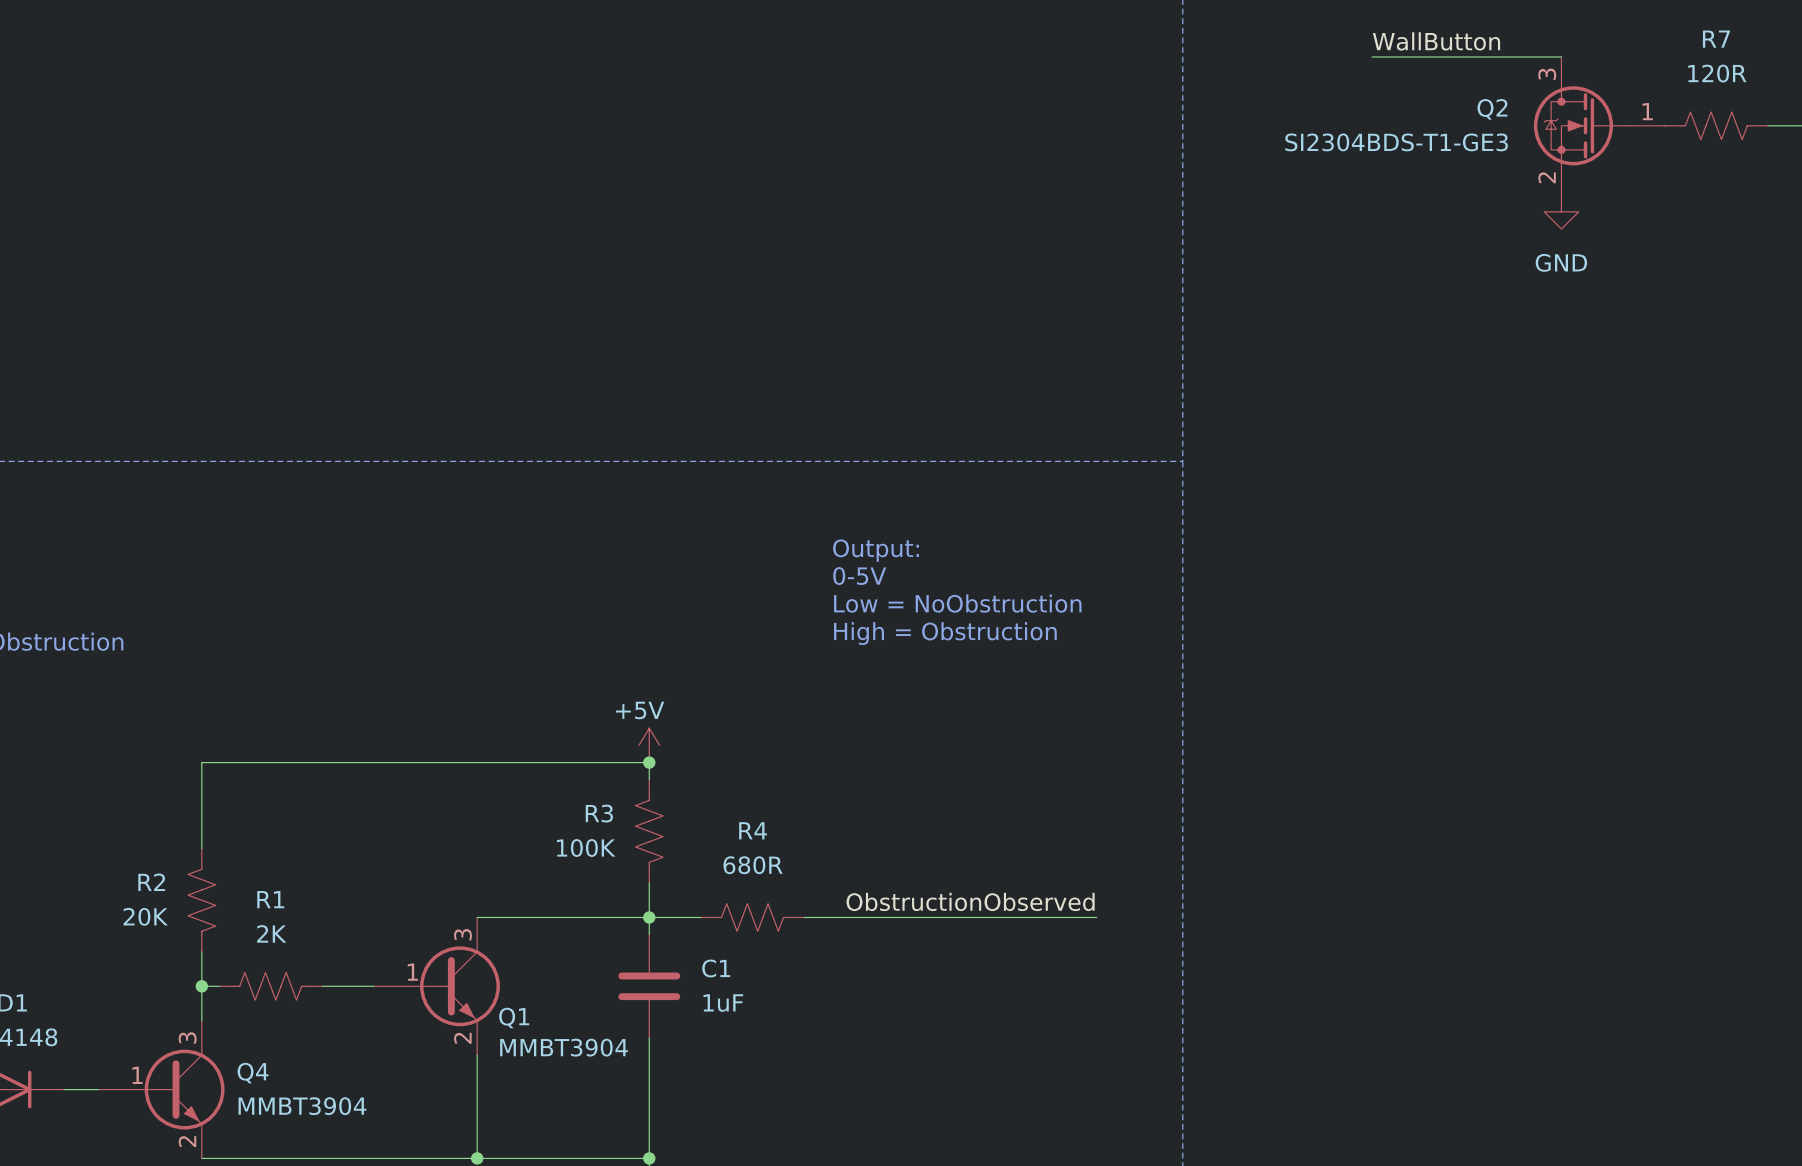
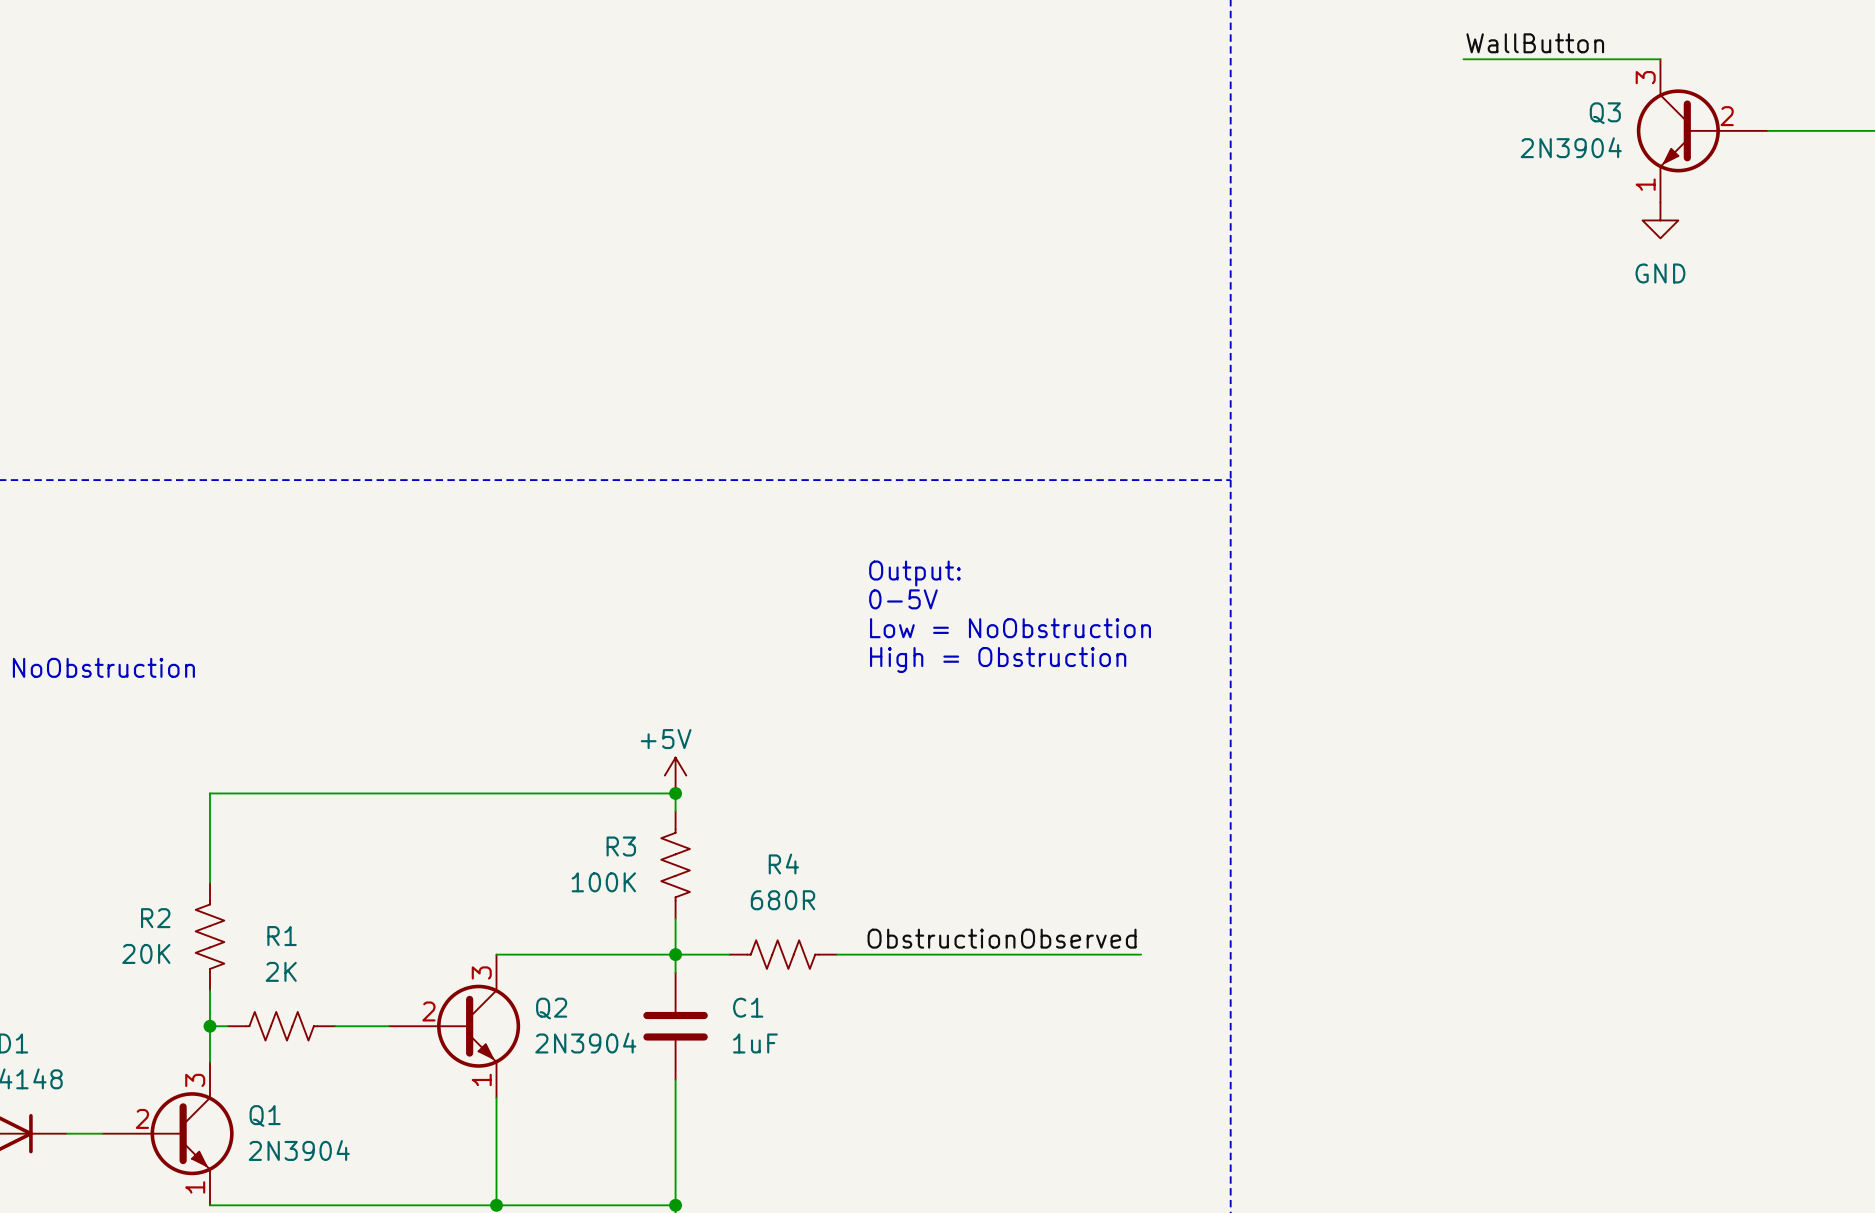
label position: WallButton (1436, 41) -> WallButton (1535, 43)
wire: (1372, 56) (1406, 56) -> (1624, 59) (1660, 59)
Q2 symbol: [1533, 56, 1665, 195] -> [389, 954, 521, 1098]
Q2 name position: Q2 (1492, 109) -> Q2 (551, 1008)
Q3: none -> 2N3904 (1702, 130)
wire: none -> (1767, 130) (1839, 130)
R7: 120R (1716, 125) -> none
Q2 value: SI2304BDS-T1-GE3 (1396, 142) -> 2N3904 (585, 1043)
power symbol position: GND (1561, 211) -> GND (1660, 220)
Q1 pin number: 1 (412, 972) -> 2 (142, 1118)
Q1 position: (436, 986) -> (168, 1133)
Q1 name position: Q1 (514, 1018) -> Q1 (265, 1115)
Q1 pin number: 2 (462, 1038) -> 1 (195, 1187)
Q1 value: MMBT3904 (564, 1047) -> 2N3904 (299, 1150)
Q4: MMBT3904 (161, 1089) -> none

